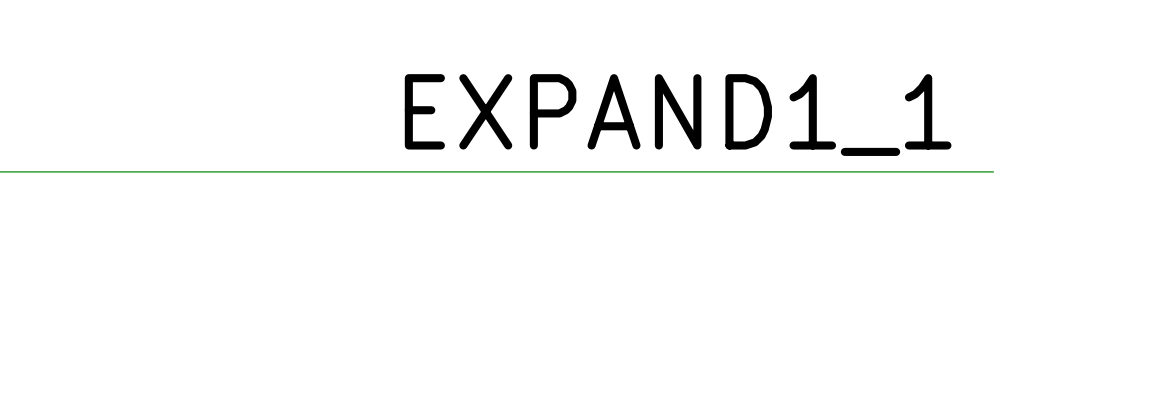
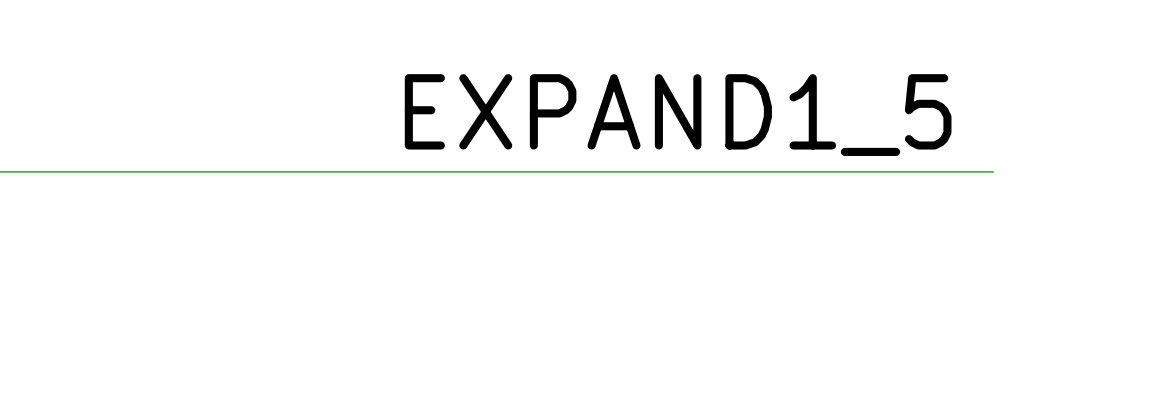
label: EXPAND1_1 (678, 115) -> EXPAND1_5 (678, 115)

